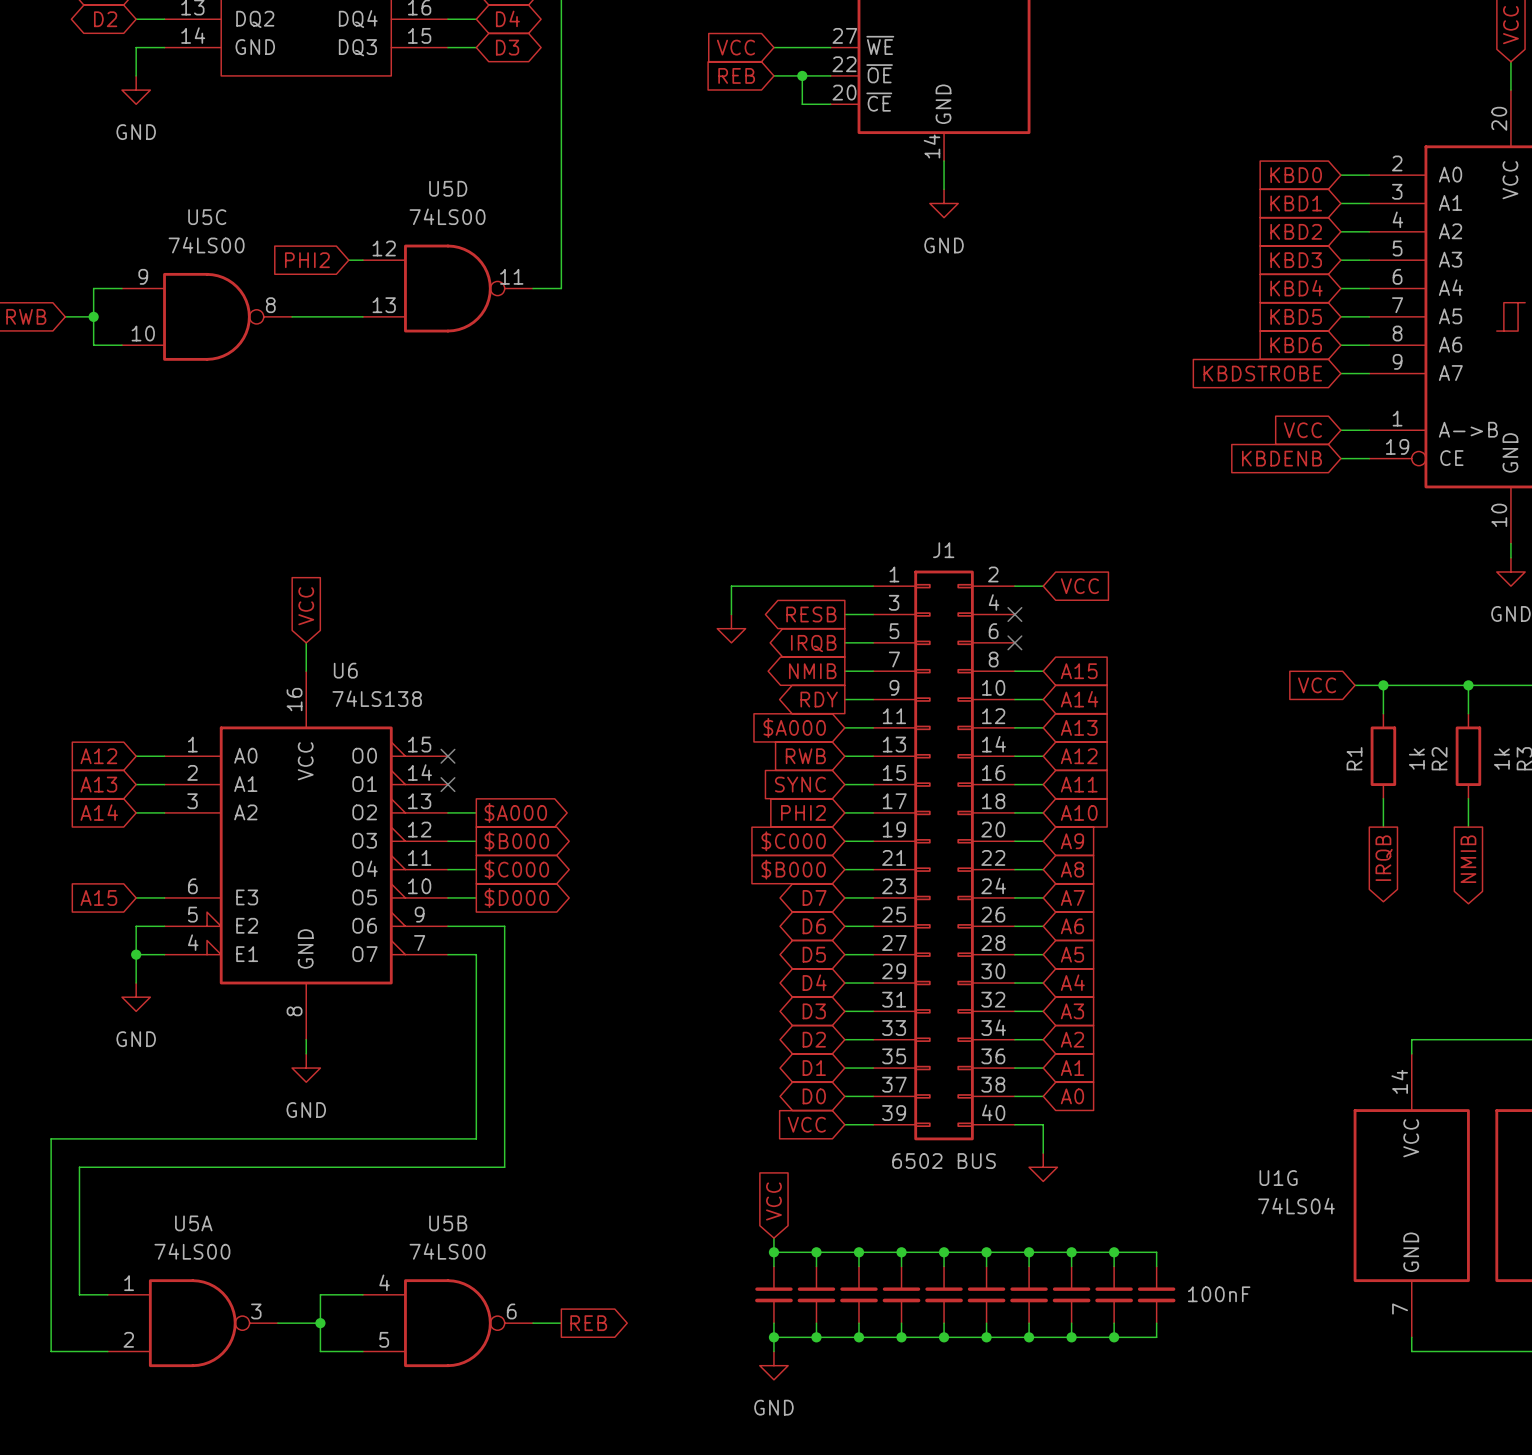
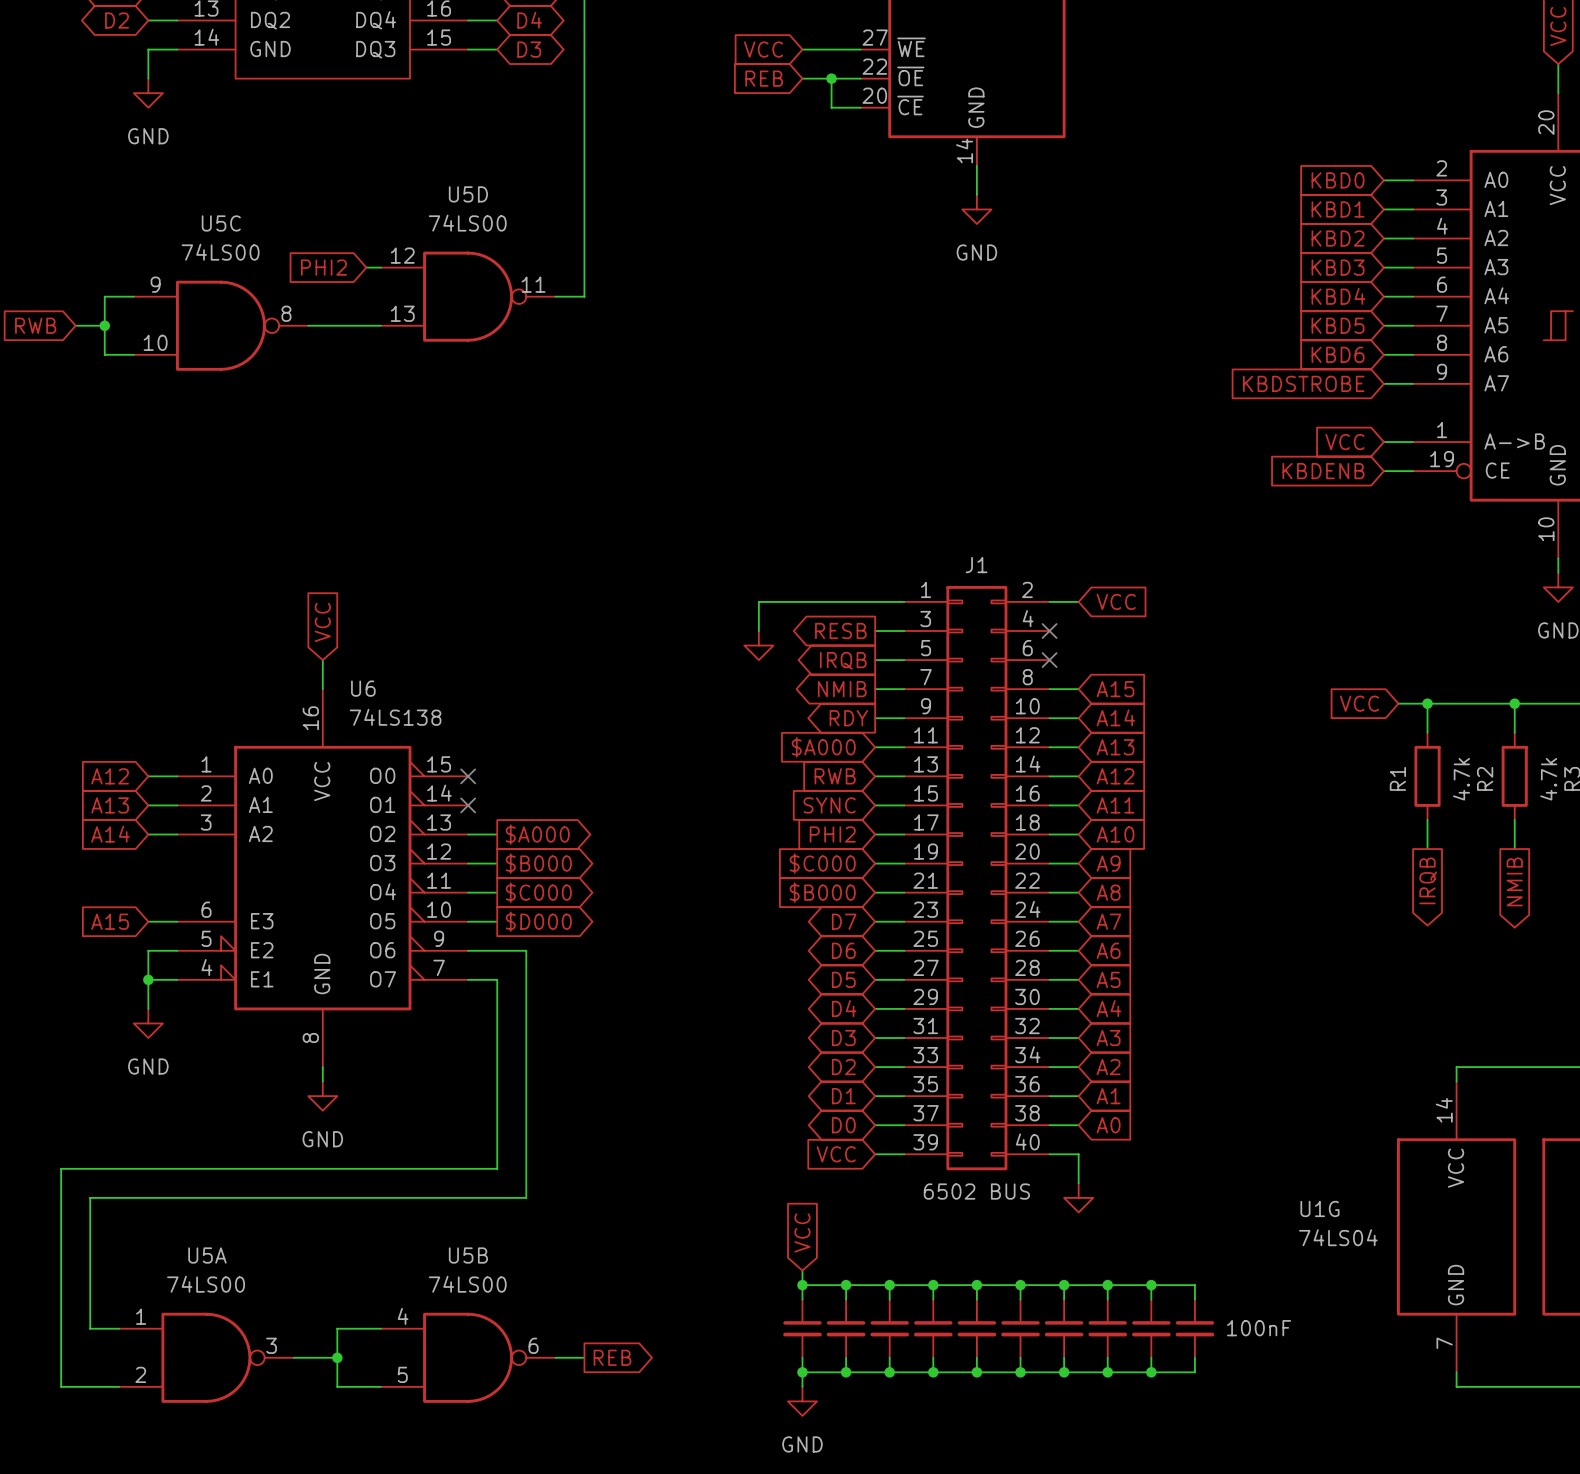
R1 value: 1k (1416, 759) -> 4.7k (1461, 779)
R2 value: 1k (1501, 759) -> 4.7k (1548, 779)

